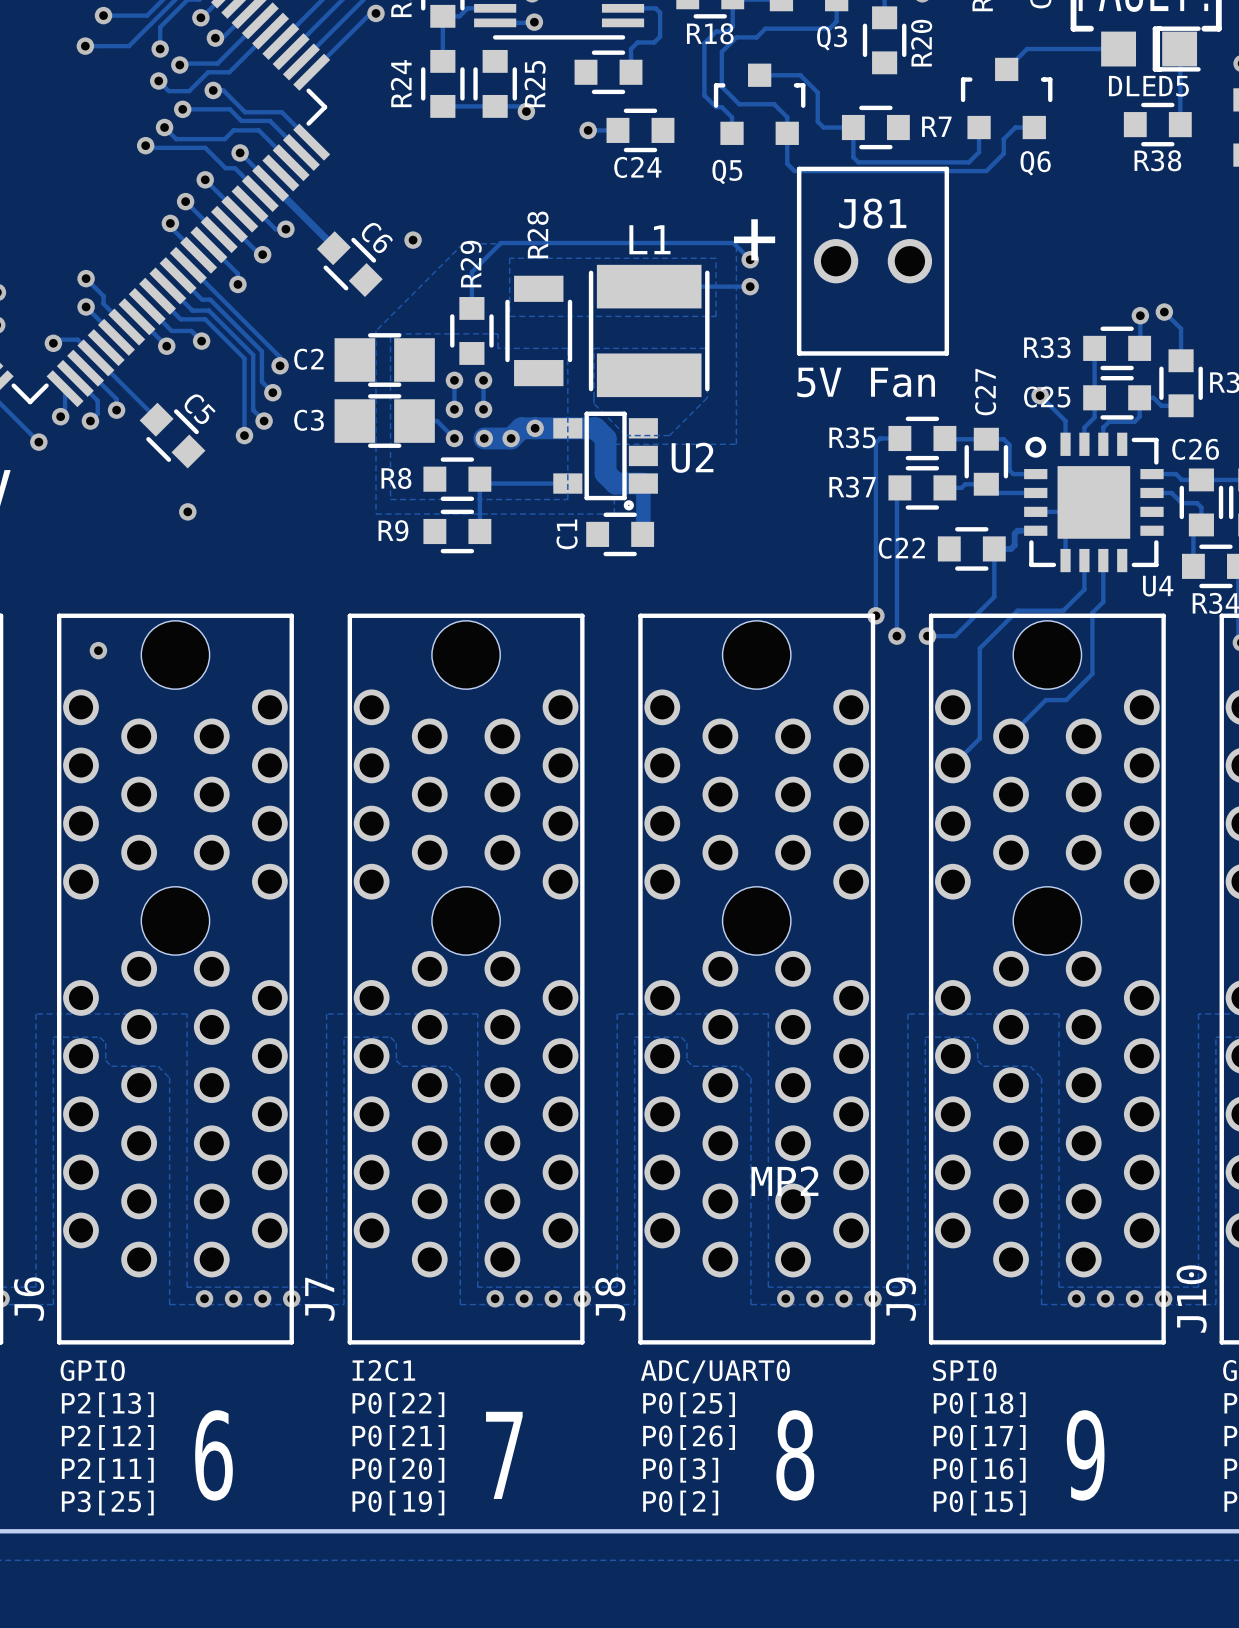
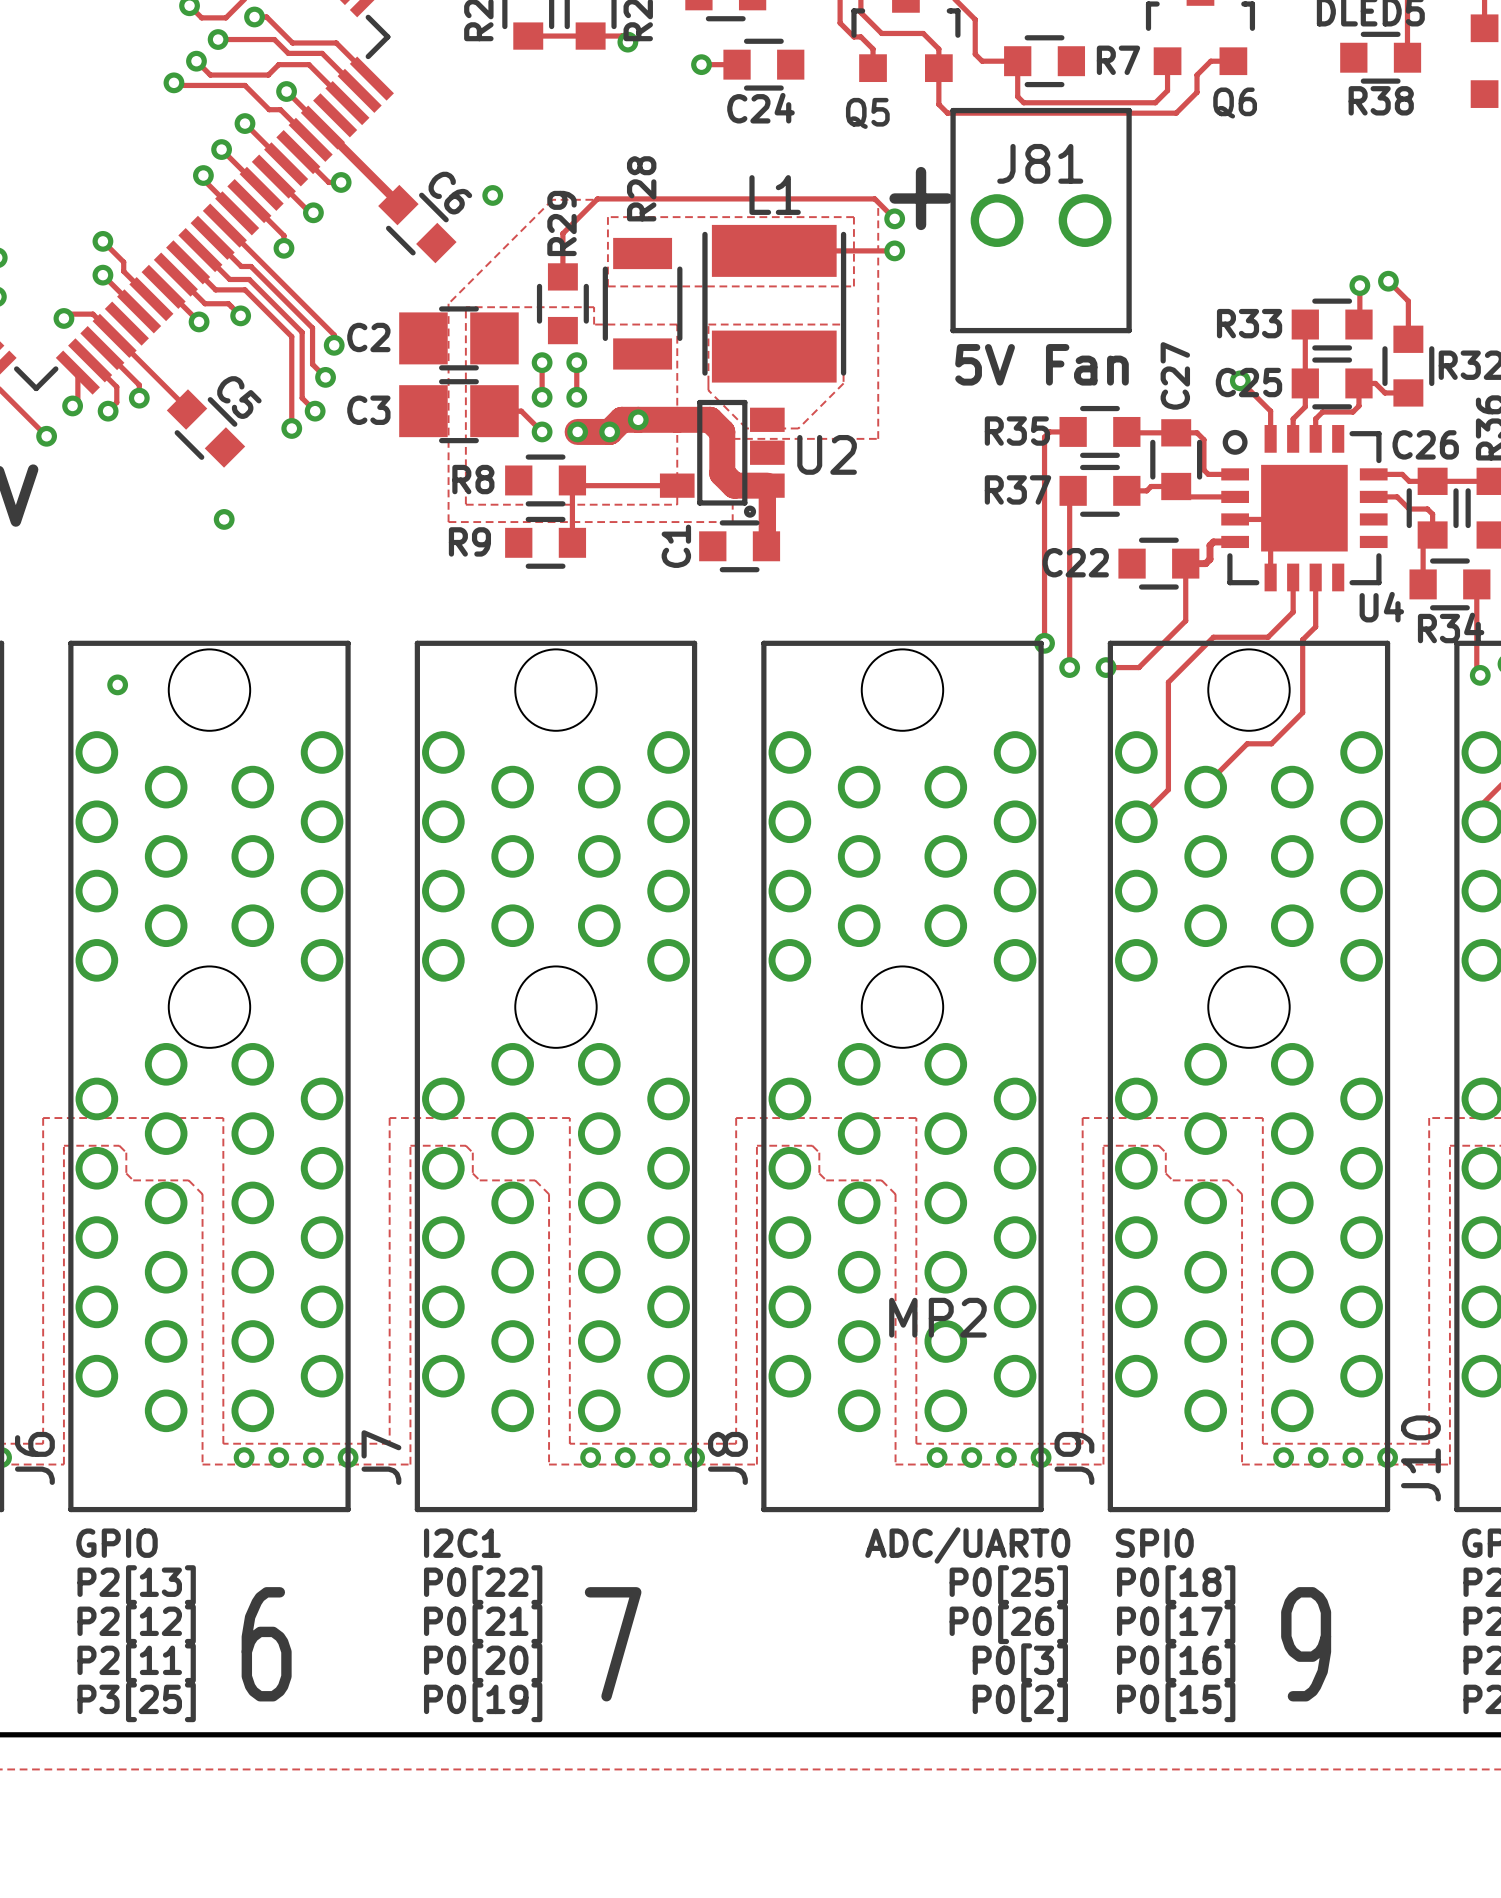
text position: ADC/UART0 (715, 1371) -> ADC/UART0 (967, 1545)
text position: P0[25] (689, 1404) -> P0[25] (1008, 1585)
text position: P0[26] (689, 1437) -> P0[26] (1008, 1624)
text: 8 (795, 1455) -> none
text position: P0[3] (680, 1470) -> P0[3] (1020, 1663)
text position: P0[2] (680, 1502) -> P0[2] (1020, 1702)

